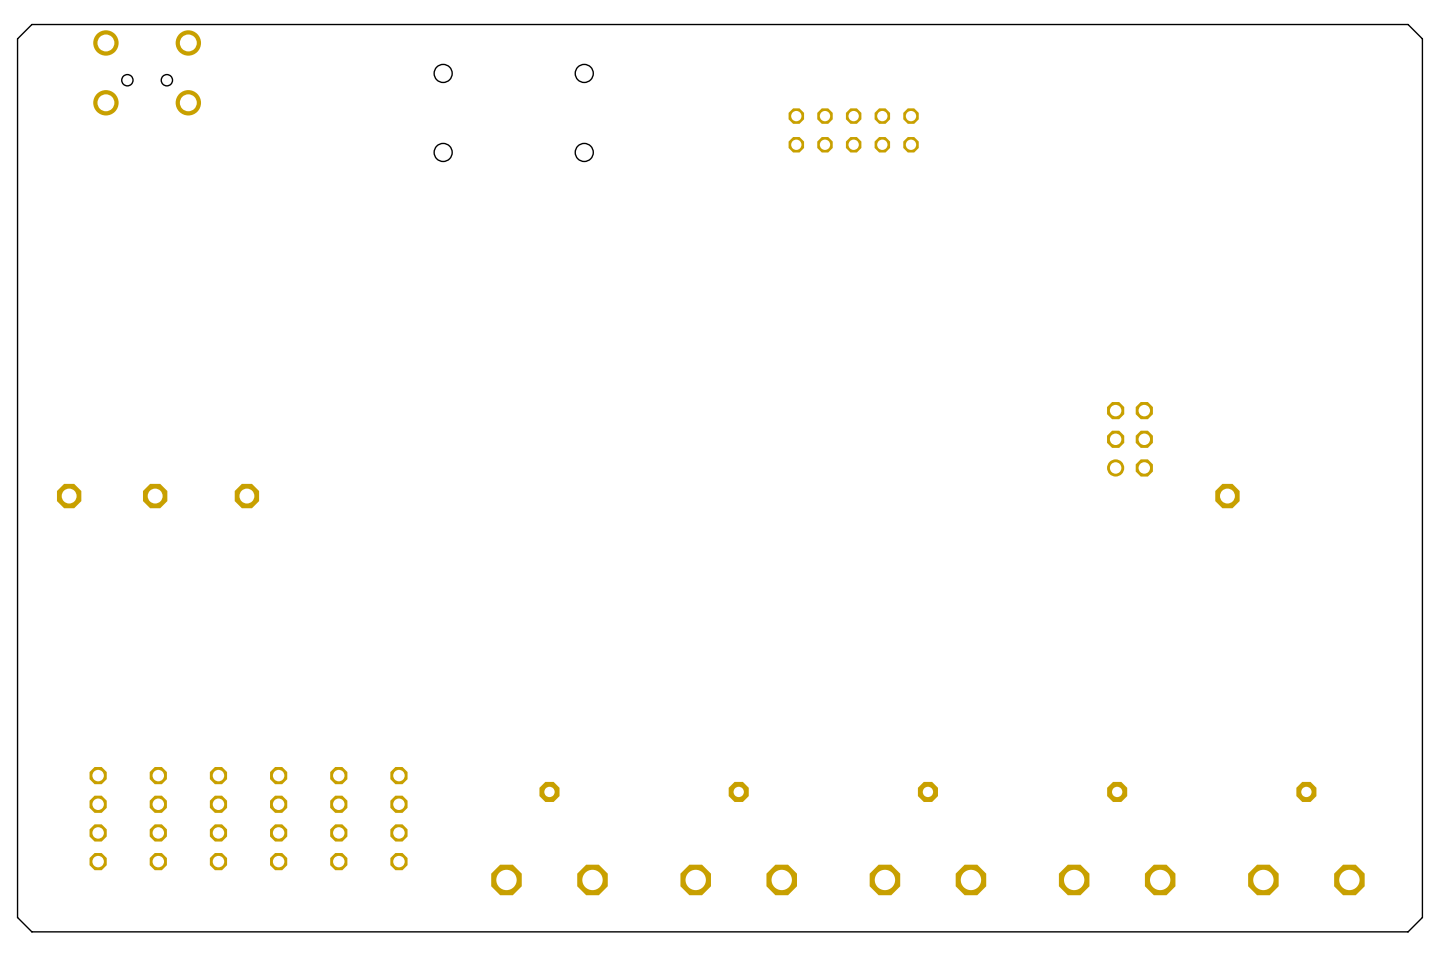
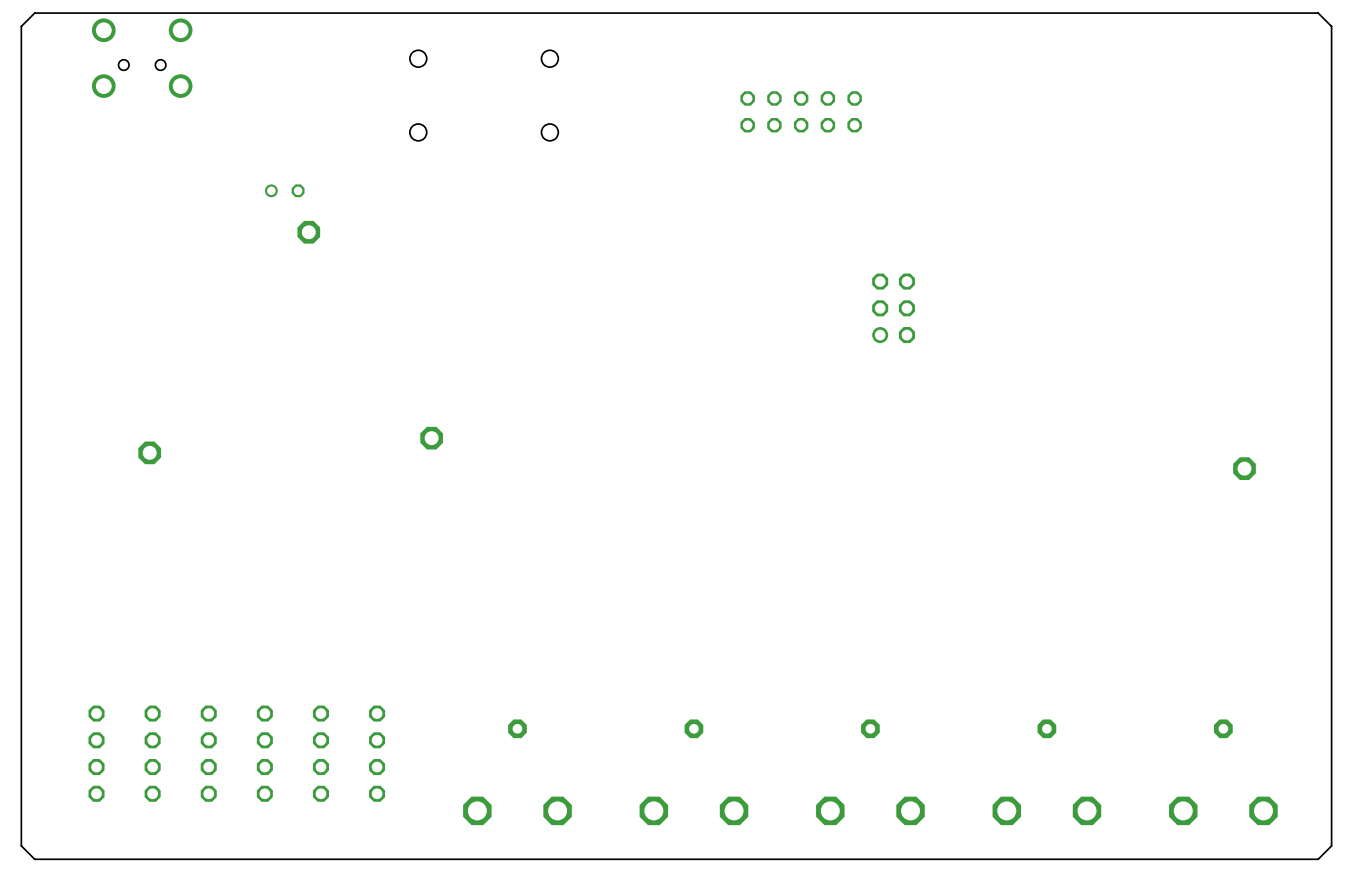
part: none -> (284, 190)
part: none -> (308, 232)
part position: (1129, 439) -> (893, 308)
part: none -> (431, 438)
part: (69, 496) -> none
part: (246, 496) -> none
part position: (1227, 496) -> (1244, 468)

